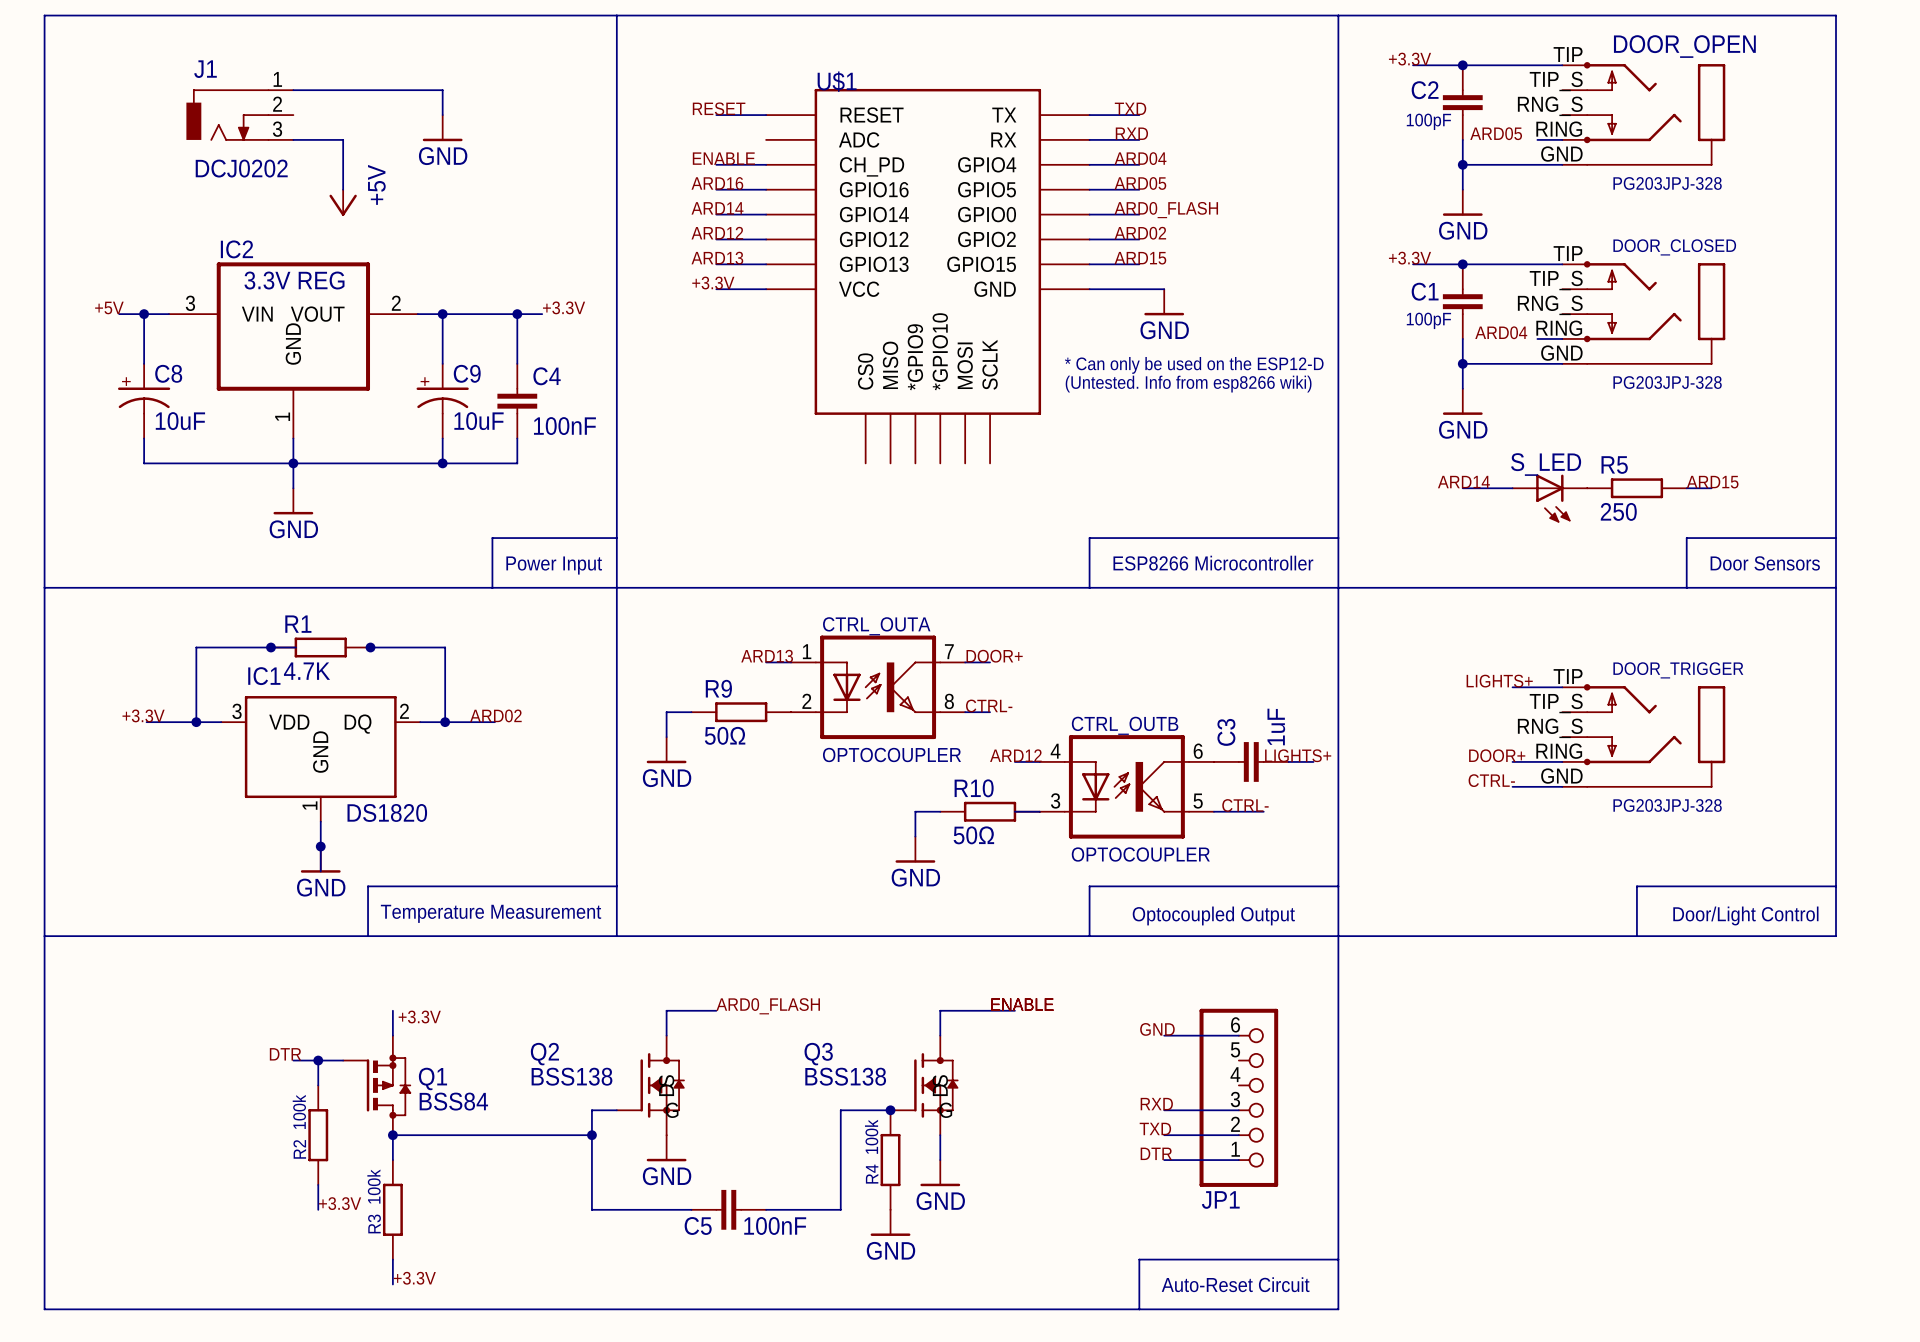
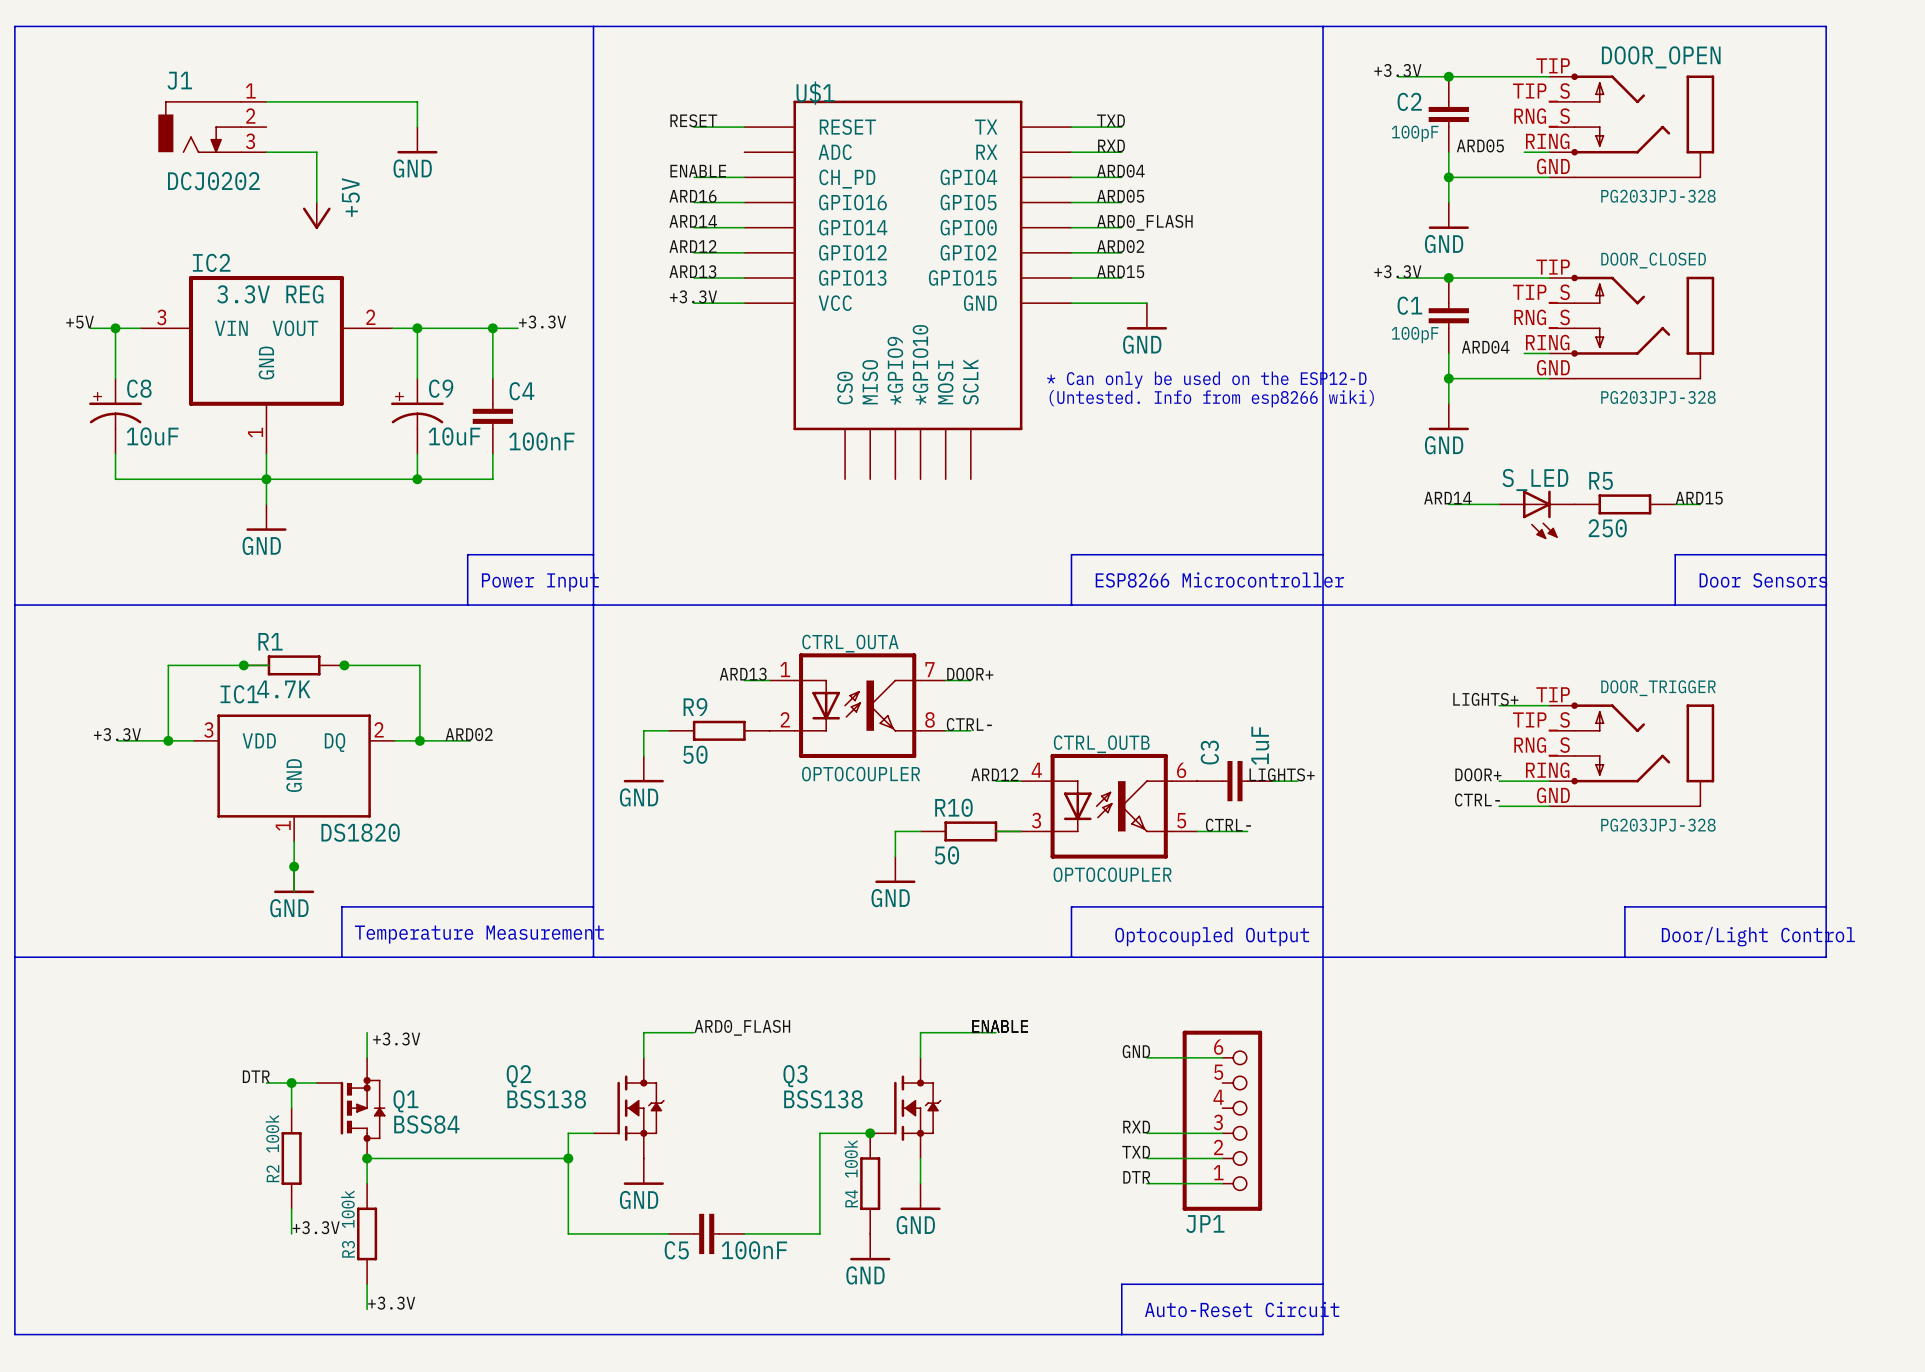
R9 value: 50Ω (725, 735) -> 50 (695, 754)
R10 value: 50Ω (973, 835) -> 50 (946, 855)
Q2 symbol: [616, 1035, 685, 1136] -> [593, 1057, 665, 1159]
Q3 symbol: [890, 1035, 959, 1136] -> [870, 1057, 942, 1159]

